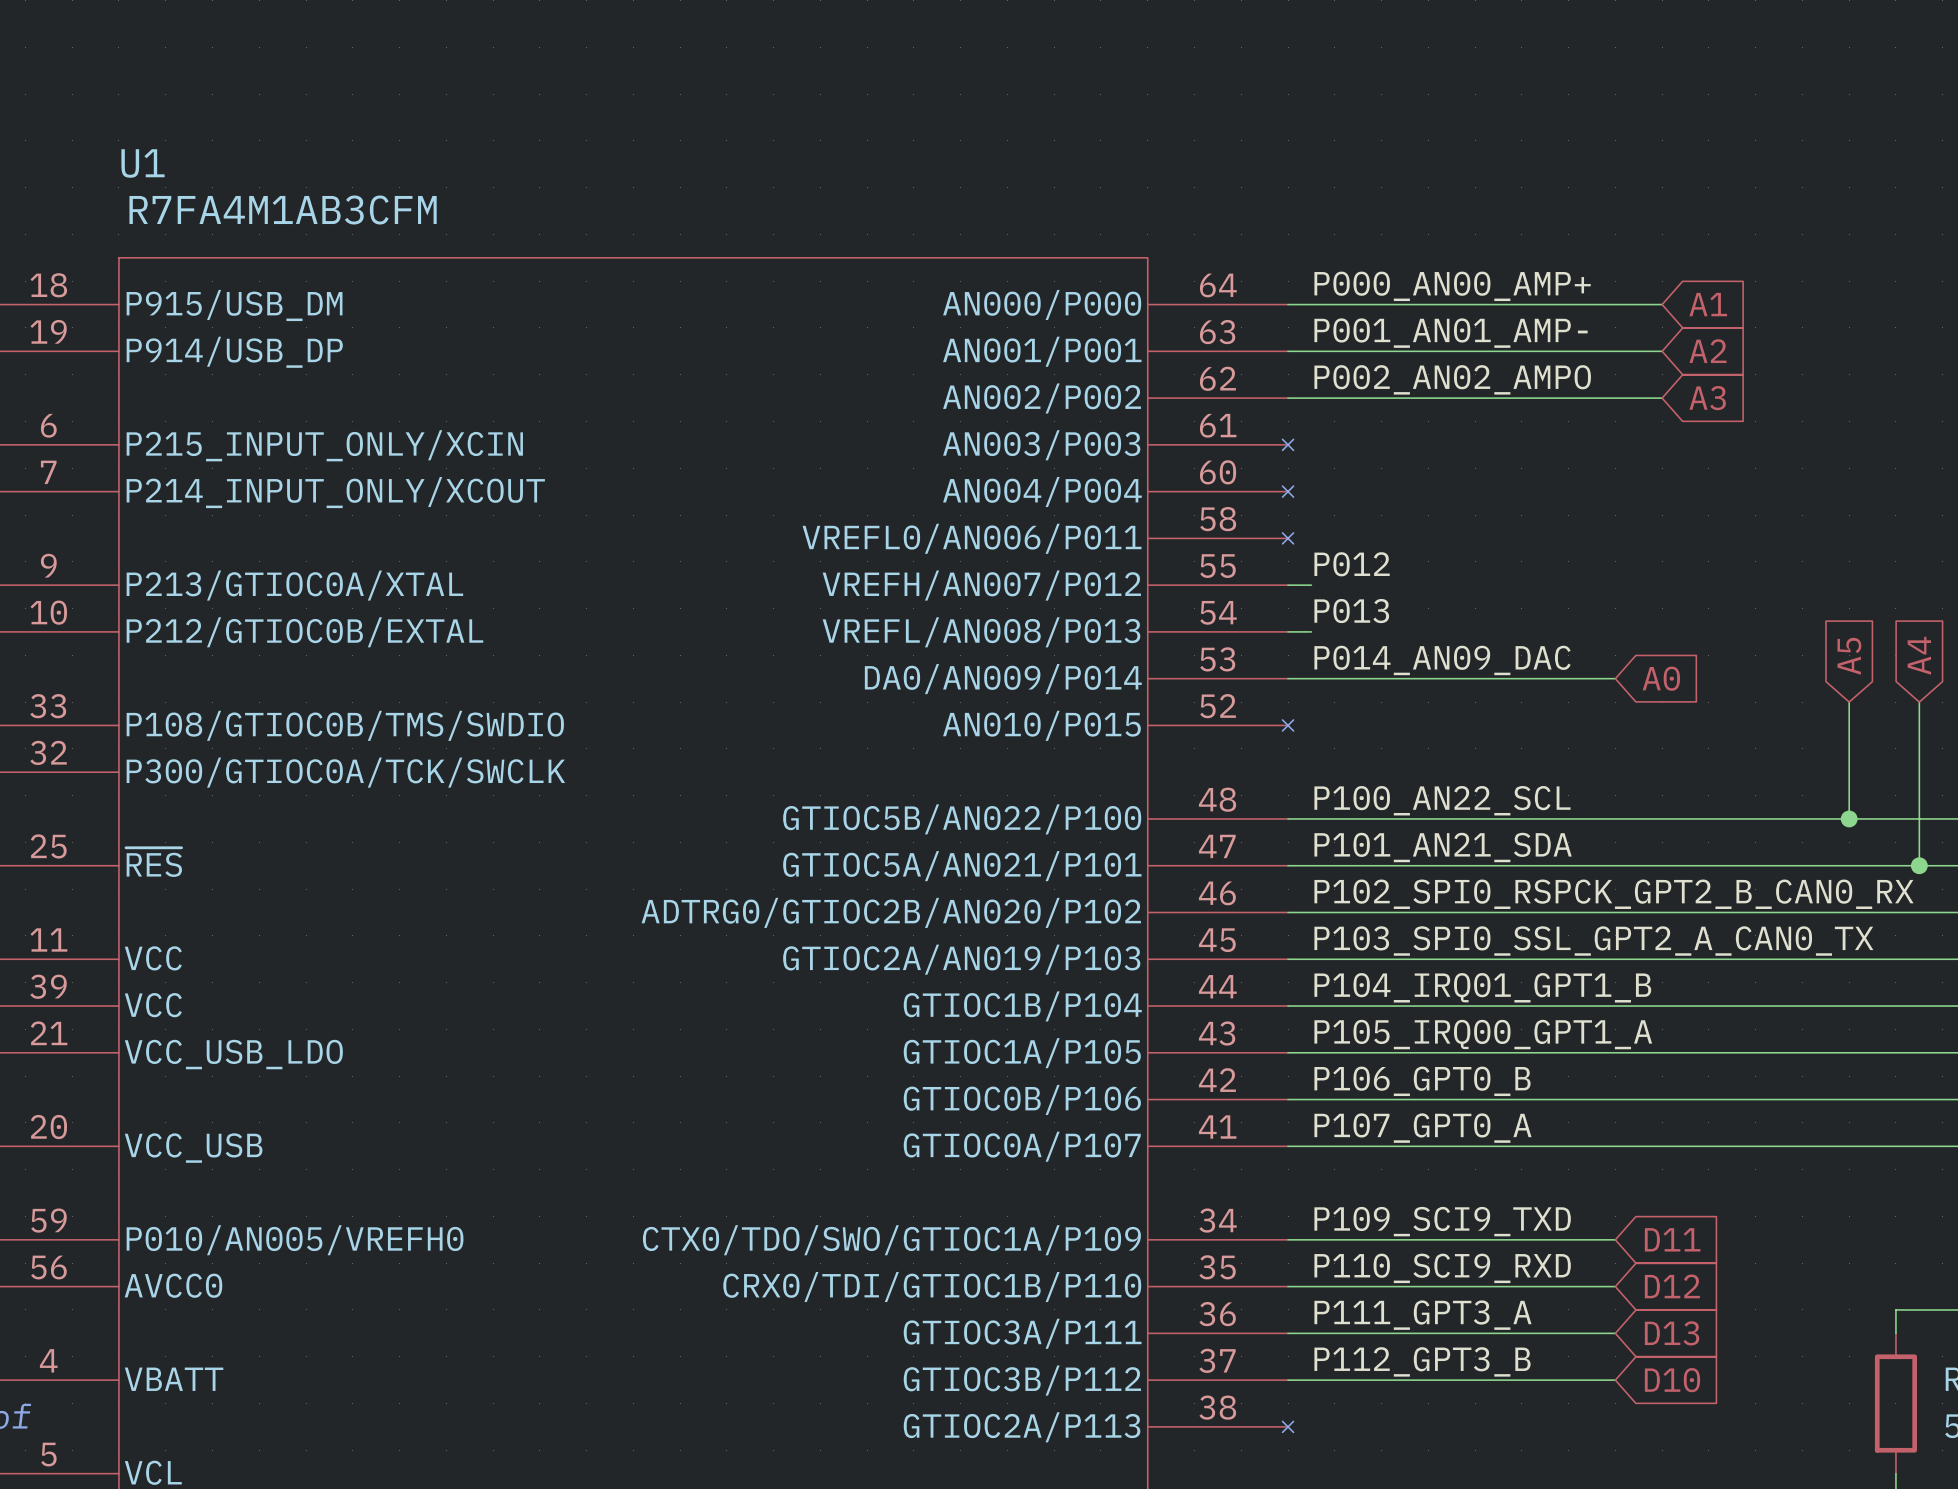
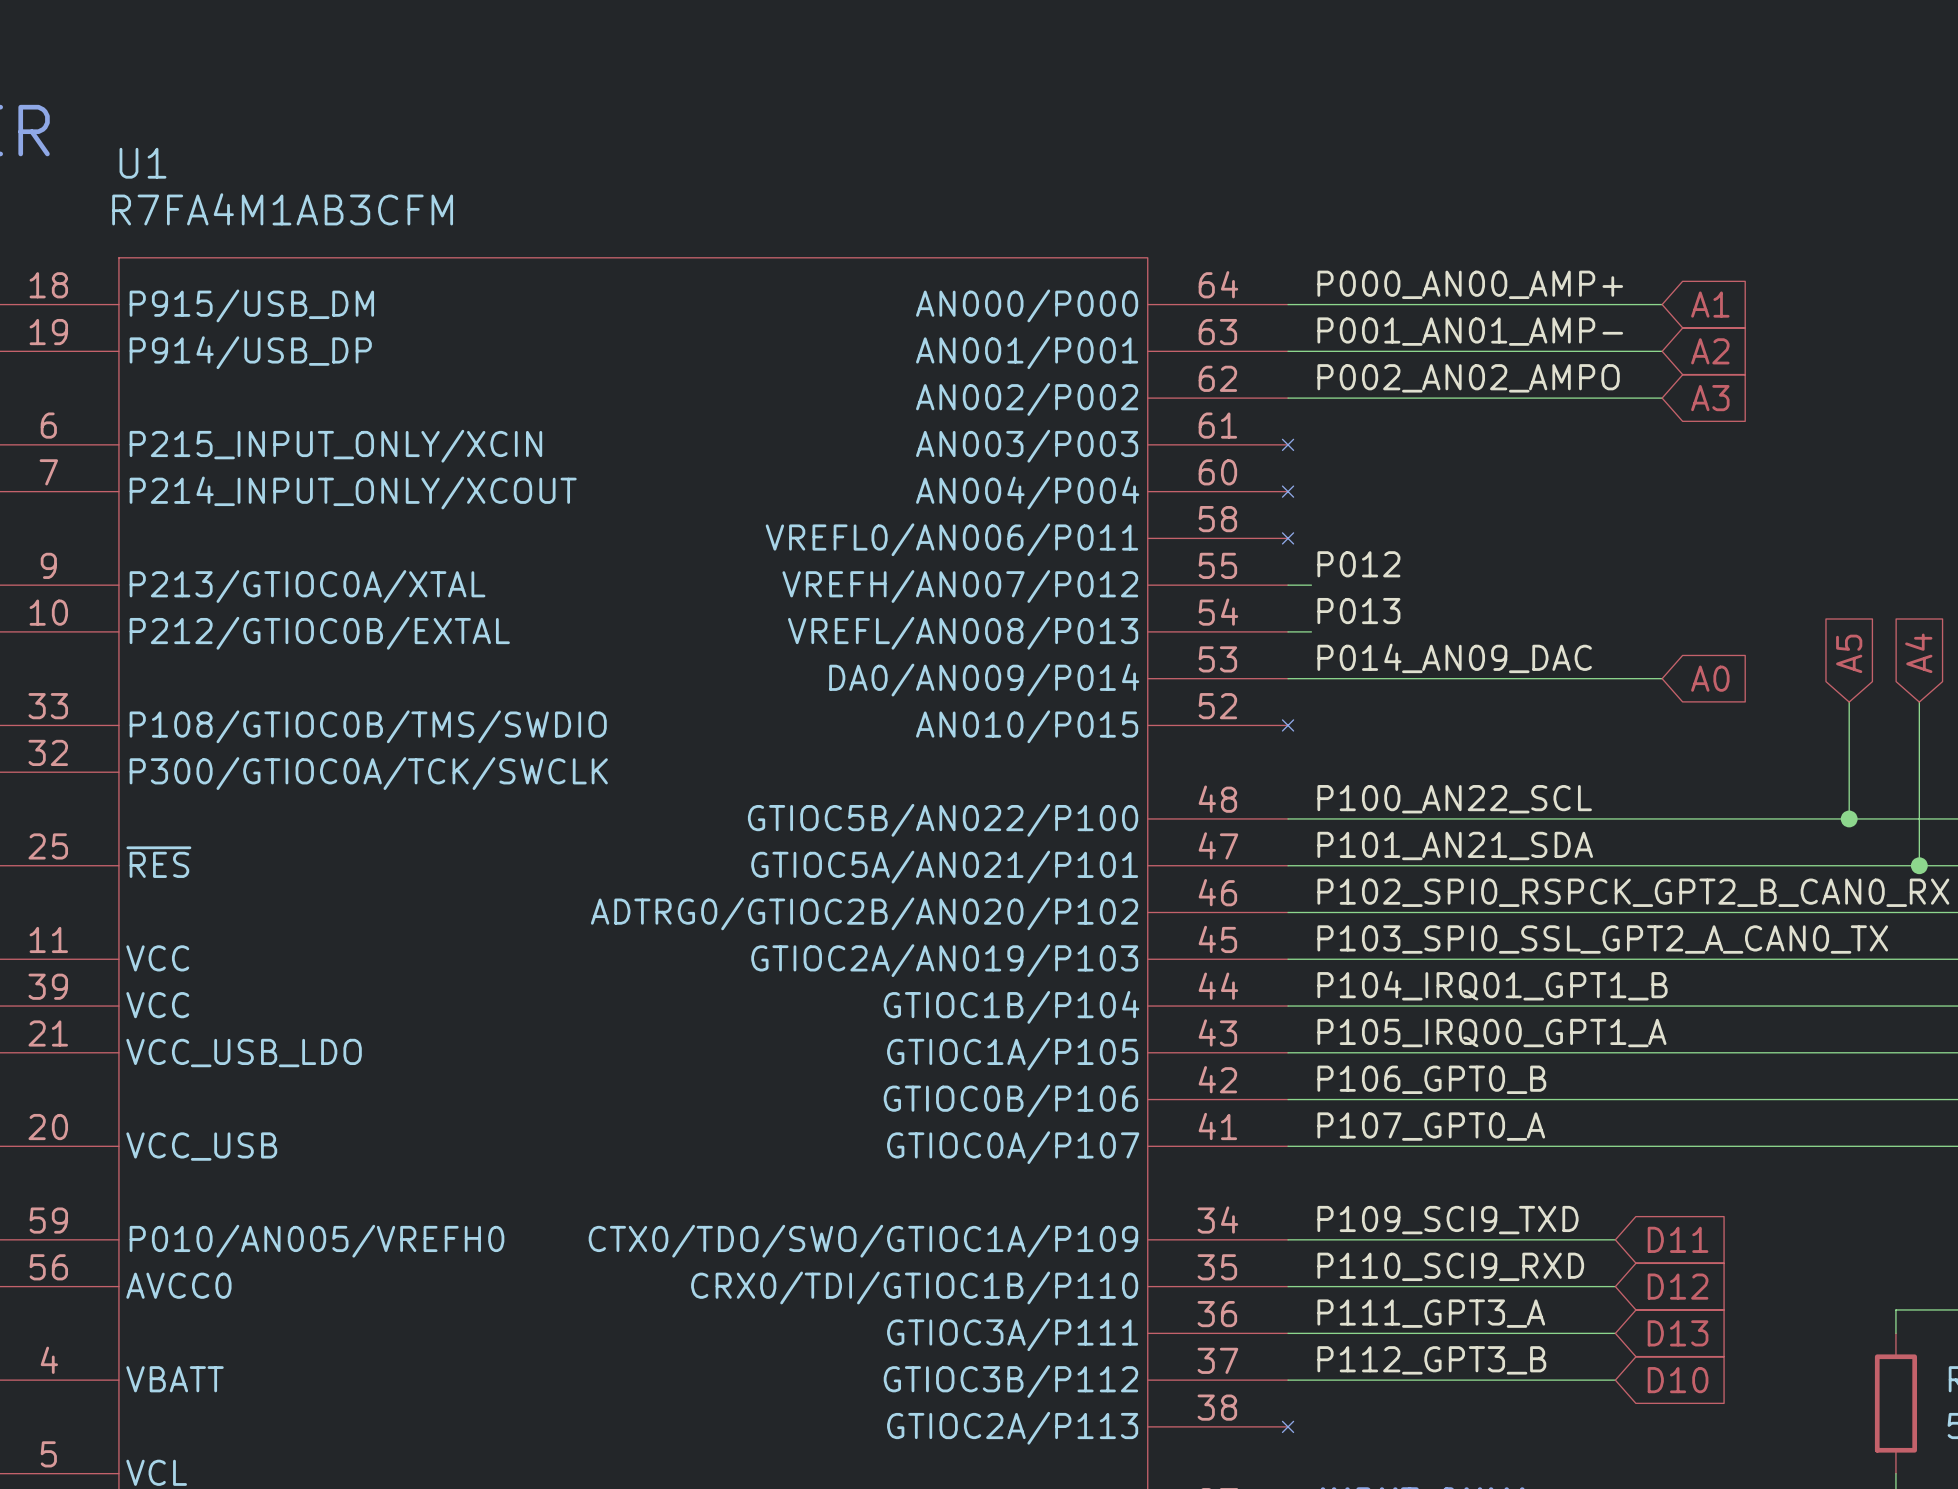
wire: none -> (1615, 678) (1662, 678)
global label position: A0 (1661, 678) -> A0 (1710, 678)

